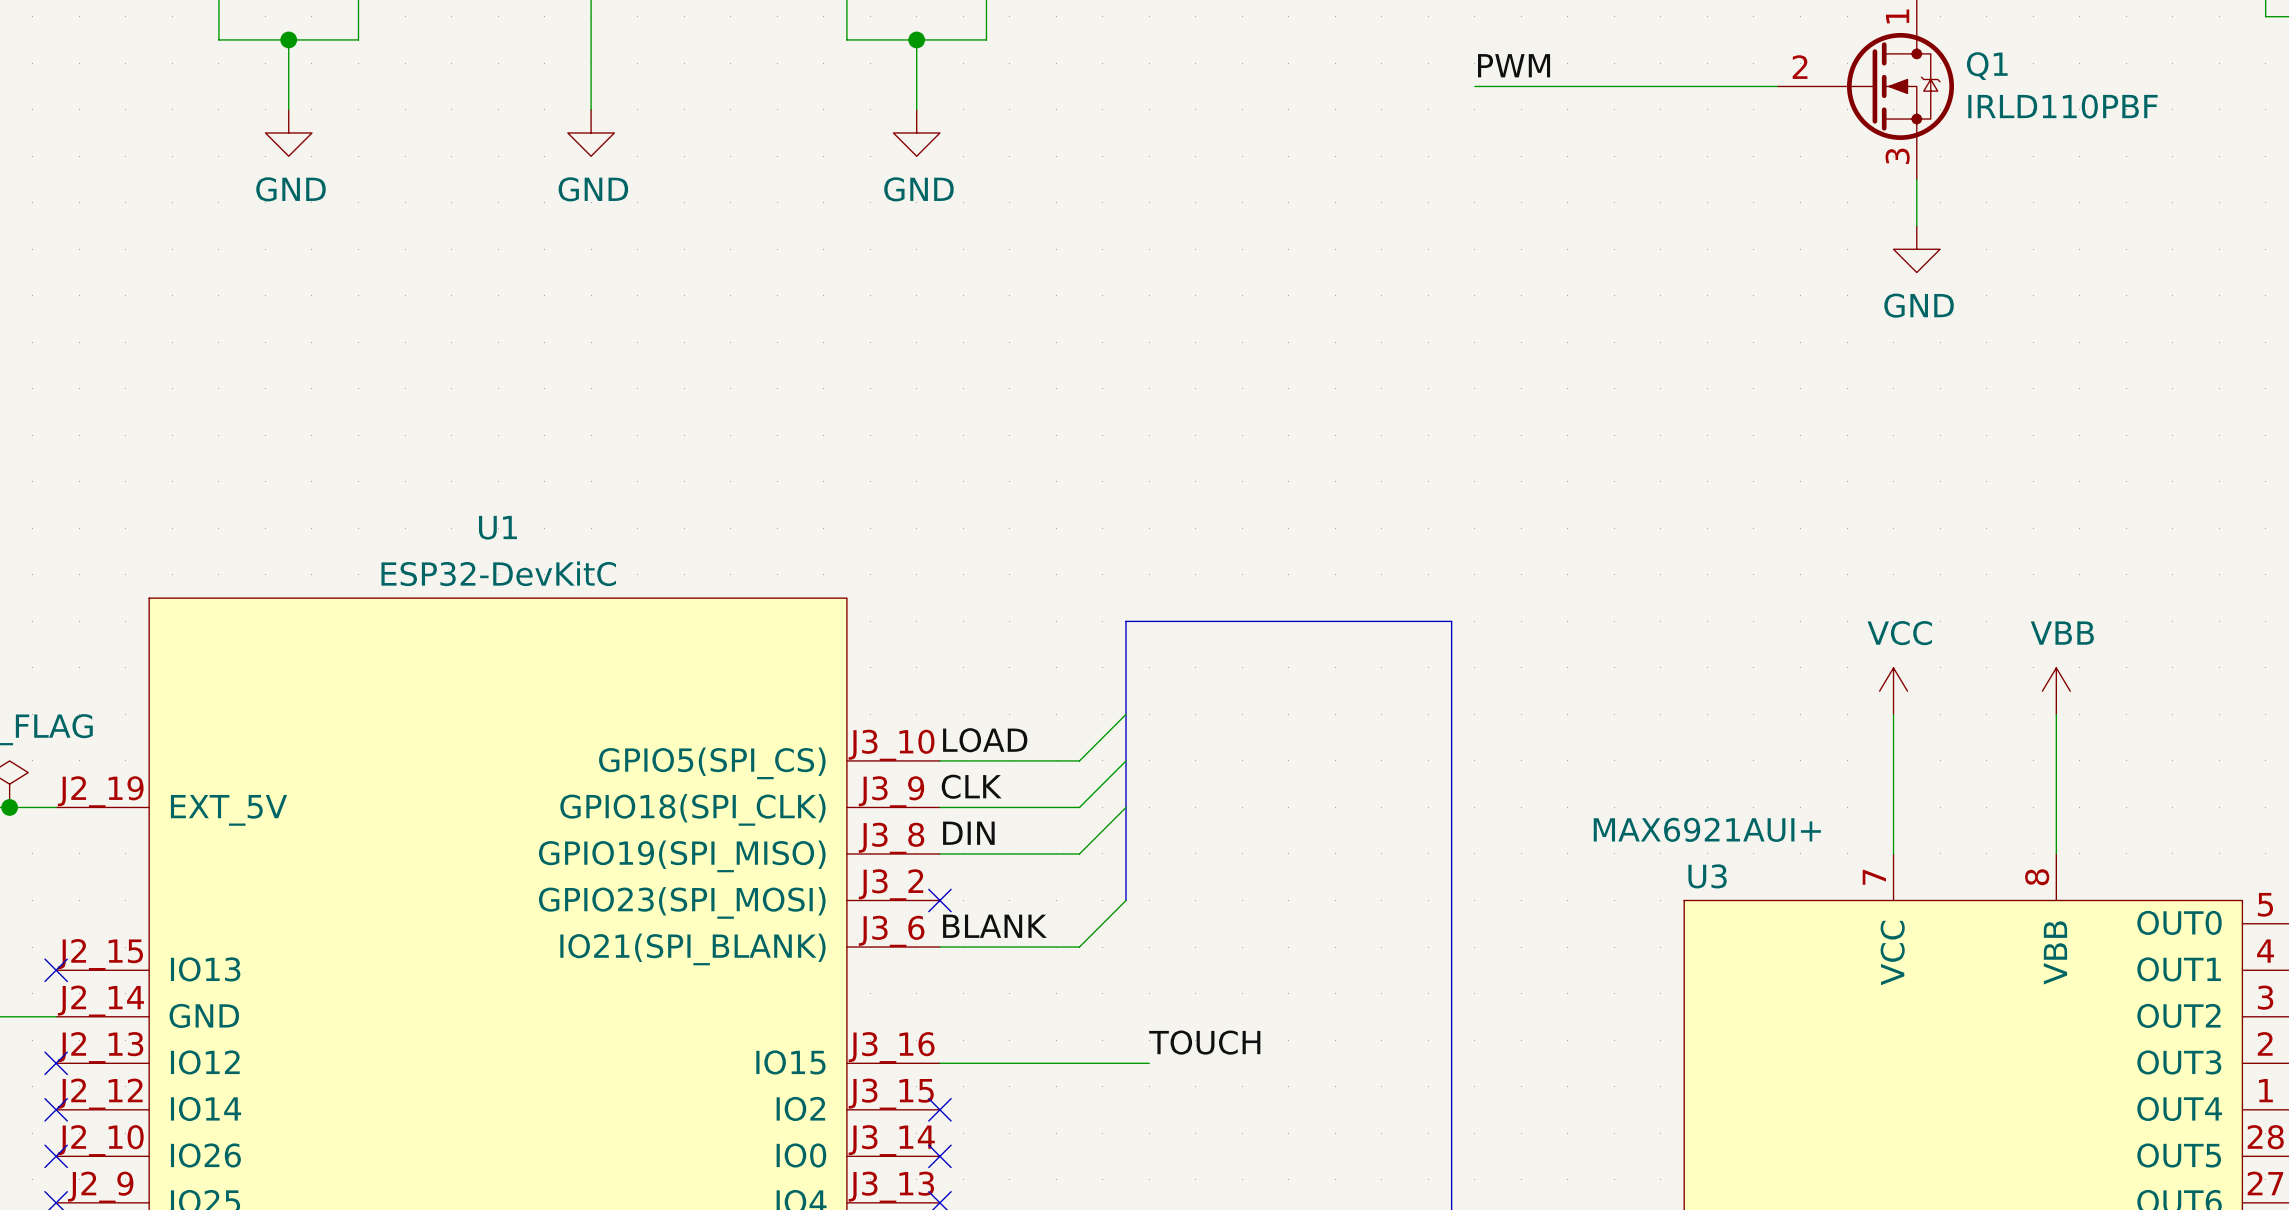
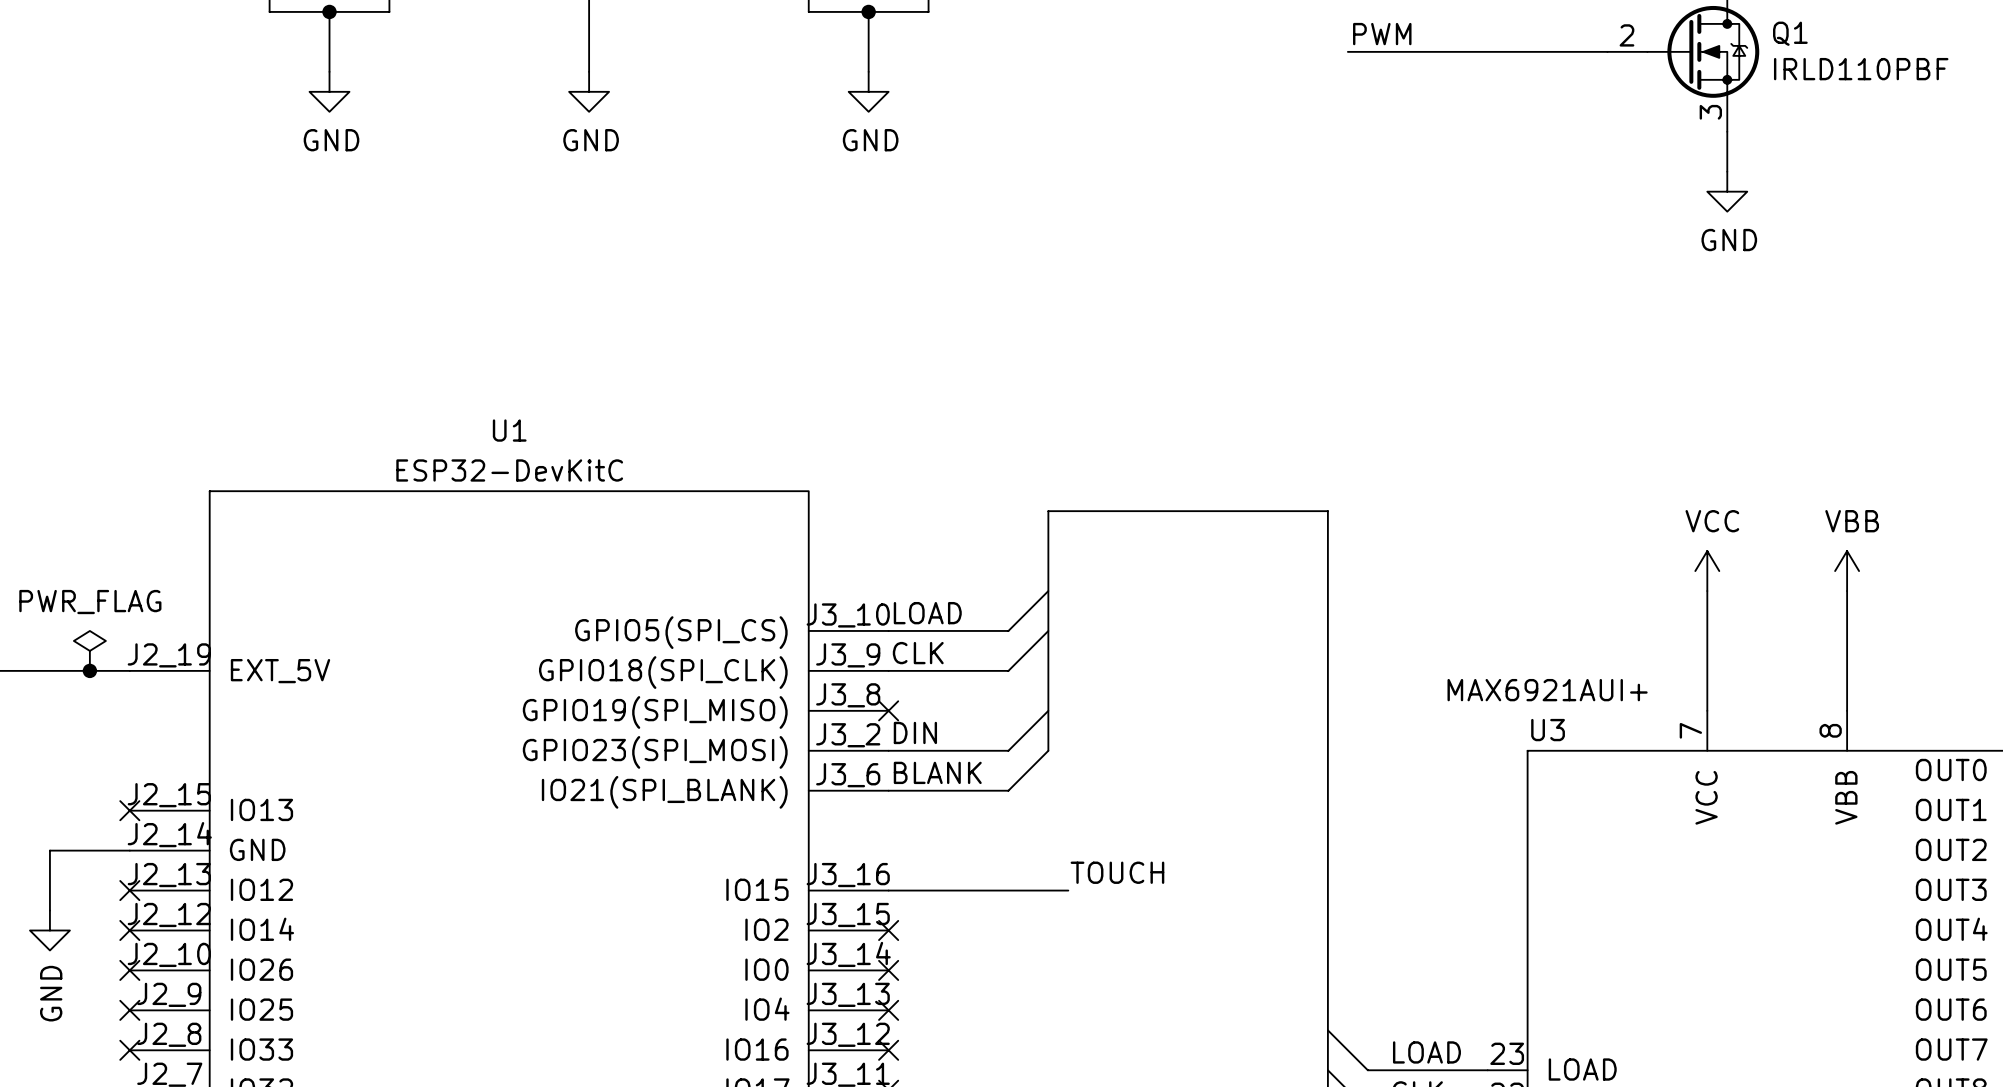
wire: (1126, 807) (1079, 853) (939, 853) -> (1048, 710) (1008, 750) (888, 750)
label position: DIN (968, 833) -> DIN (915, 732)
no-connect mark position: (939, 900) -> (888, 710)

